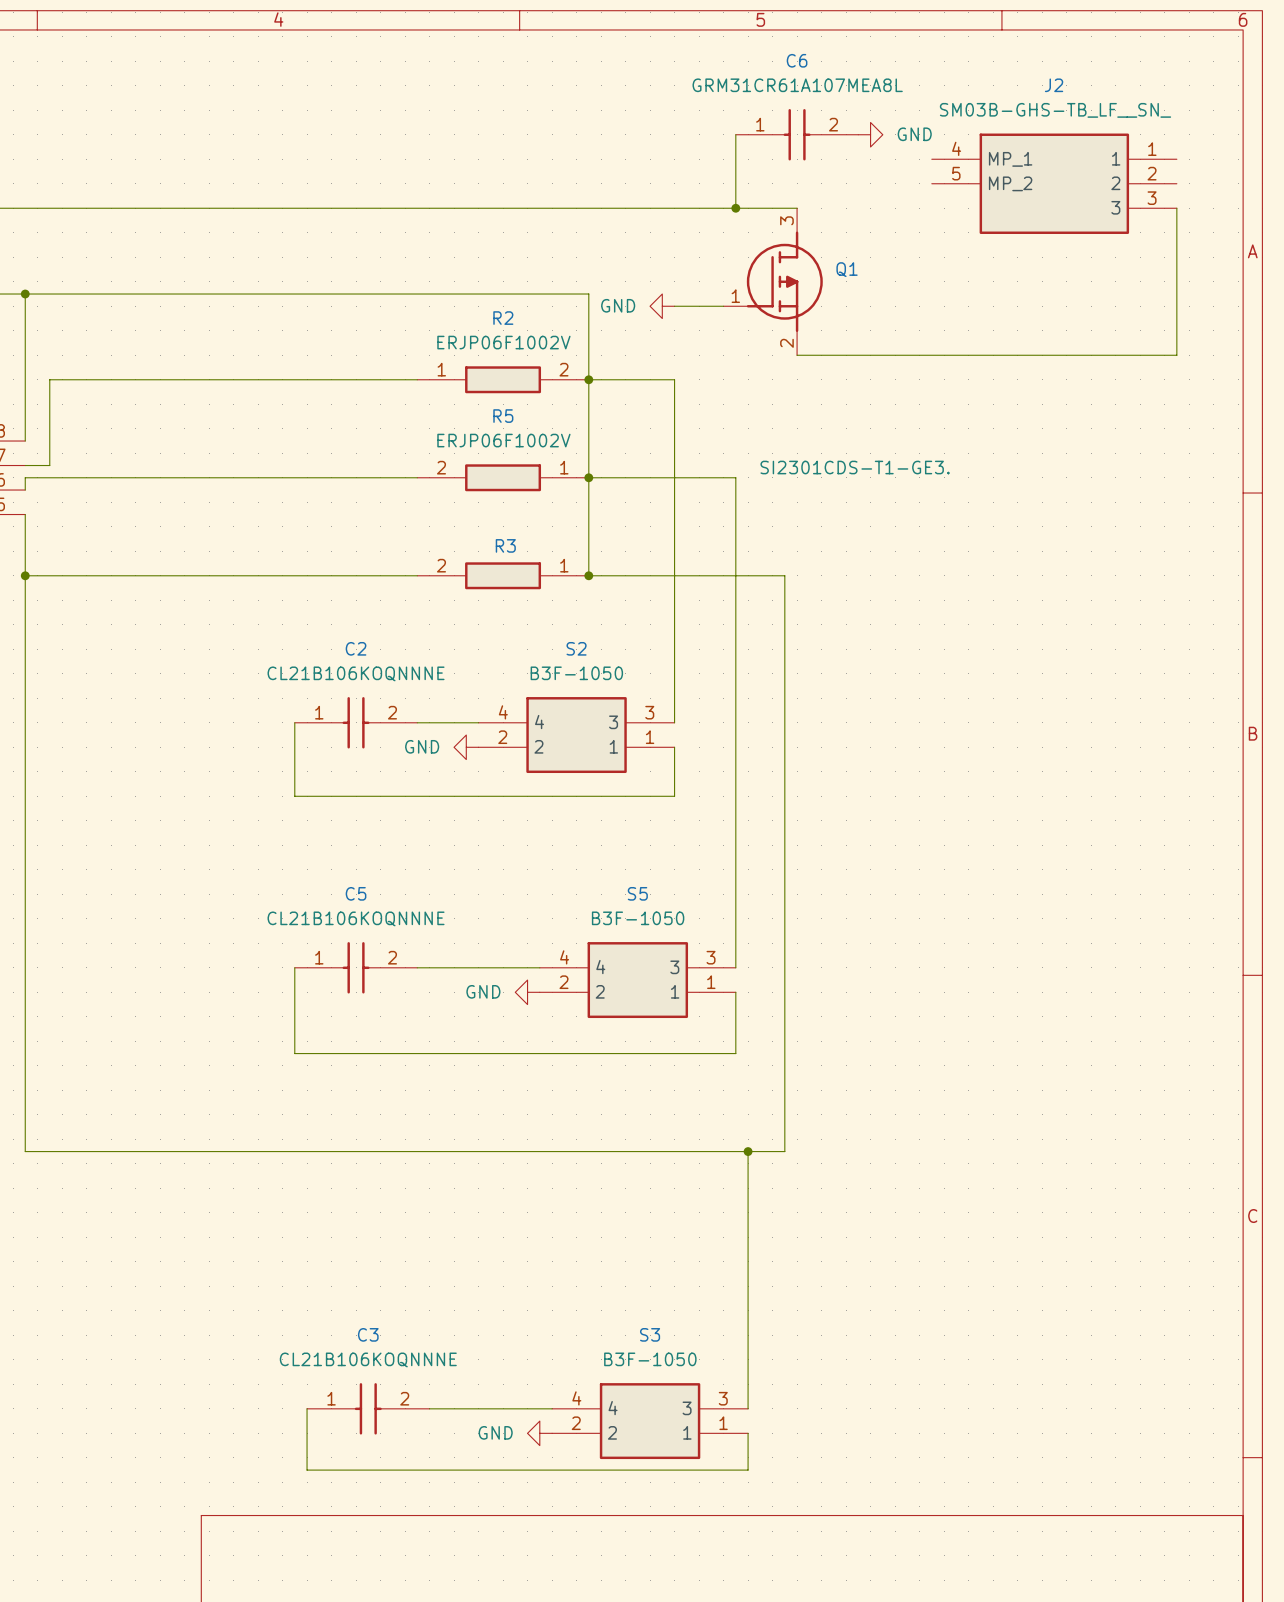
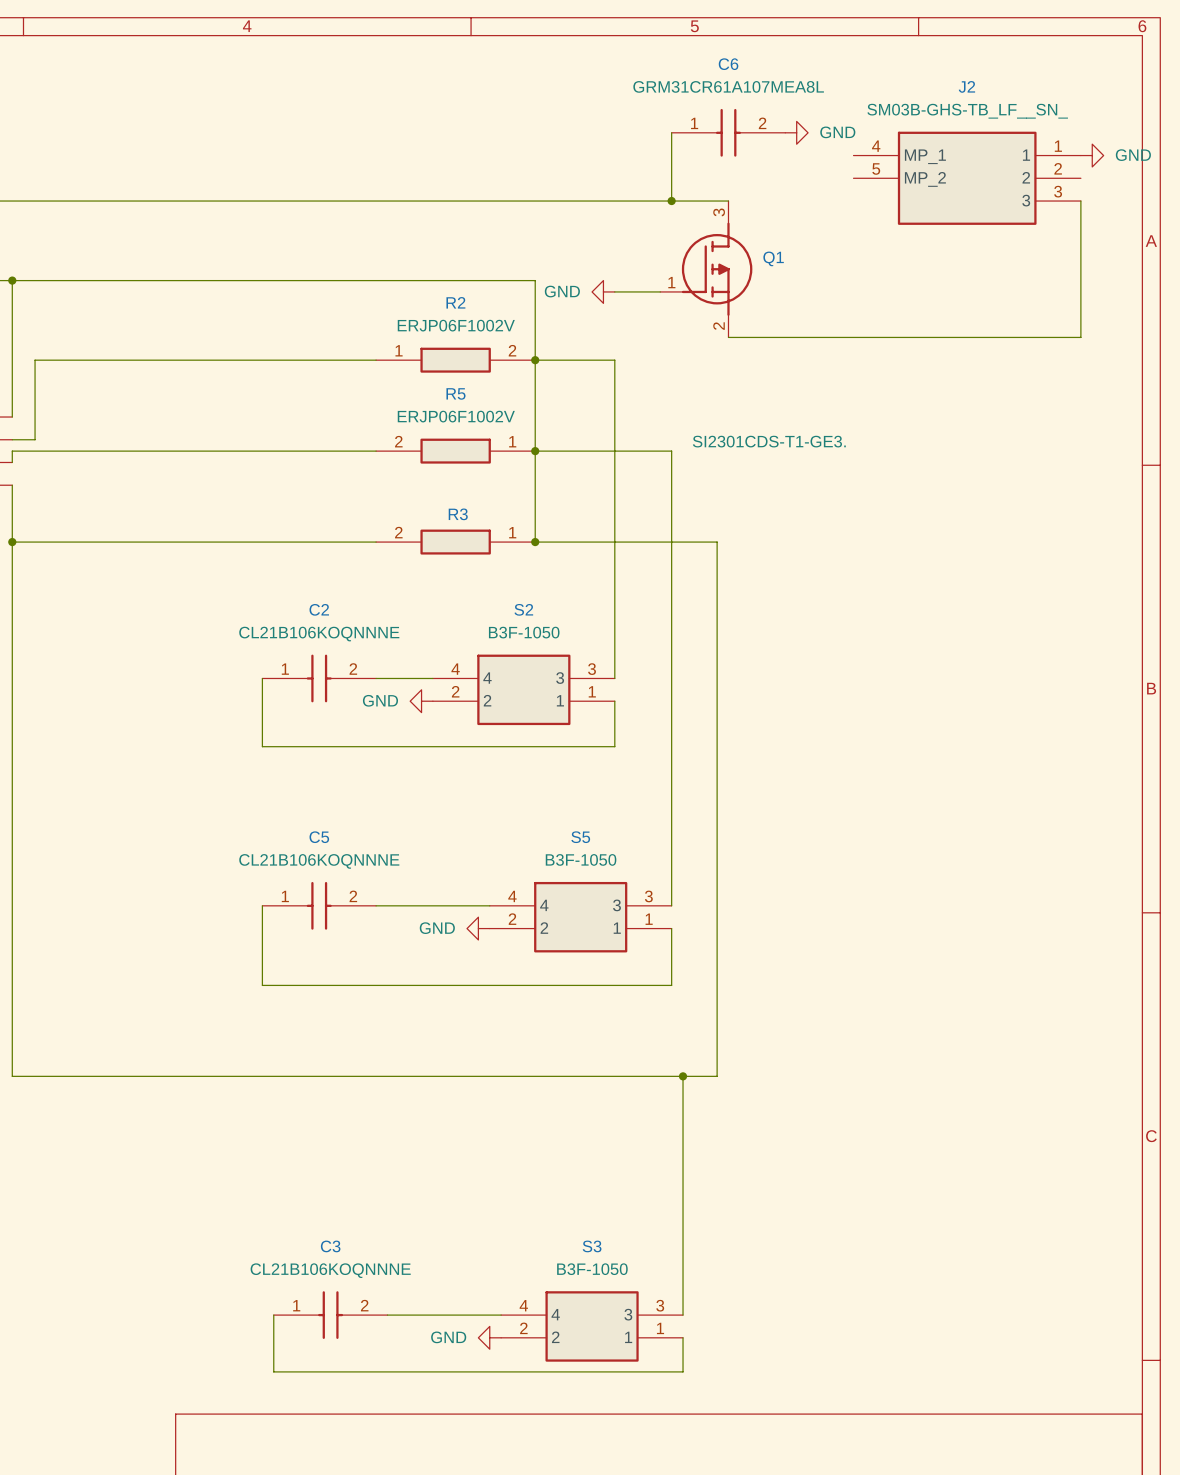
power symbol: none -> GND (1092, 155)

